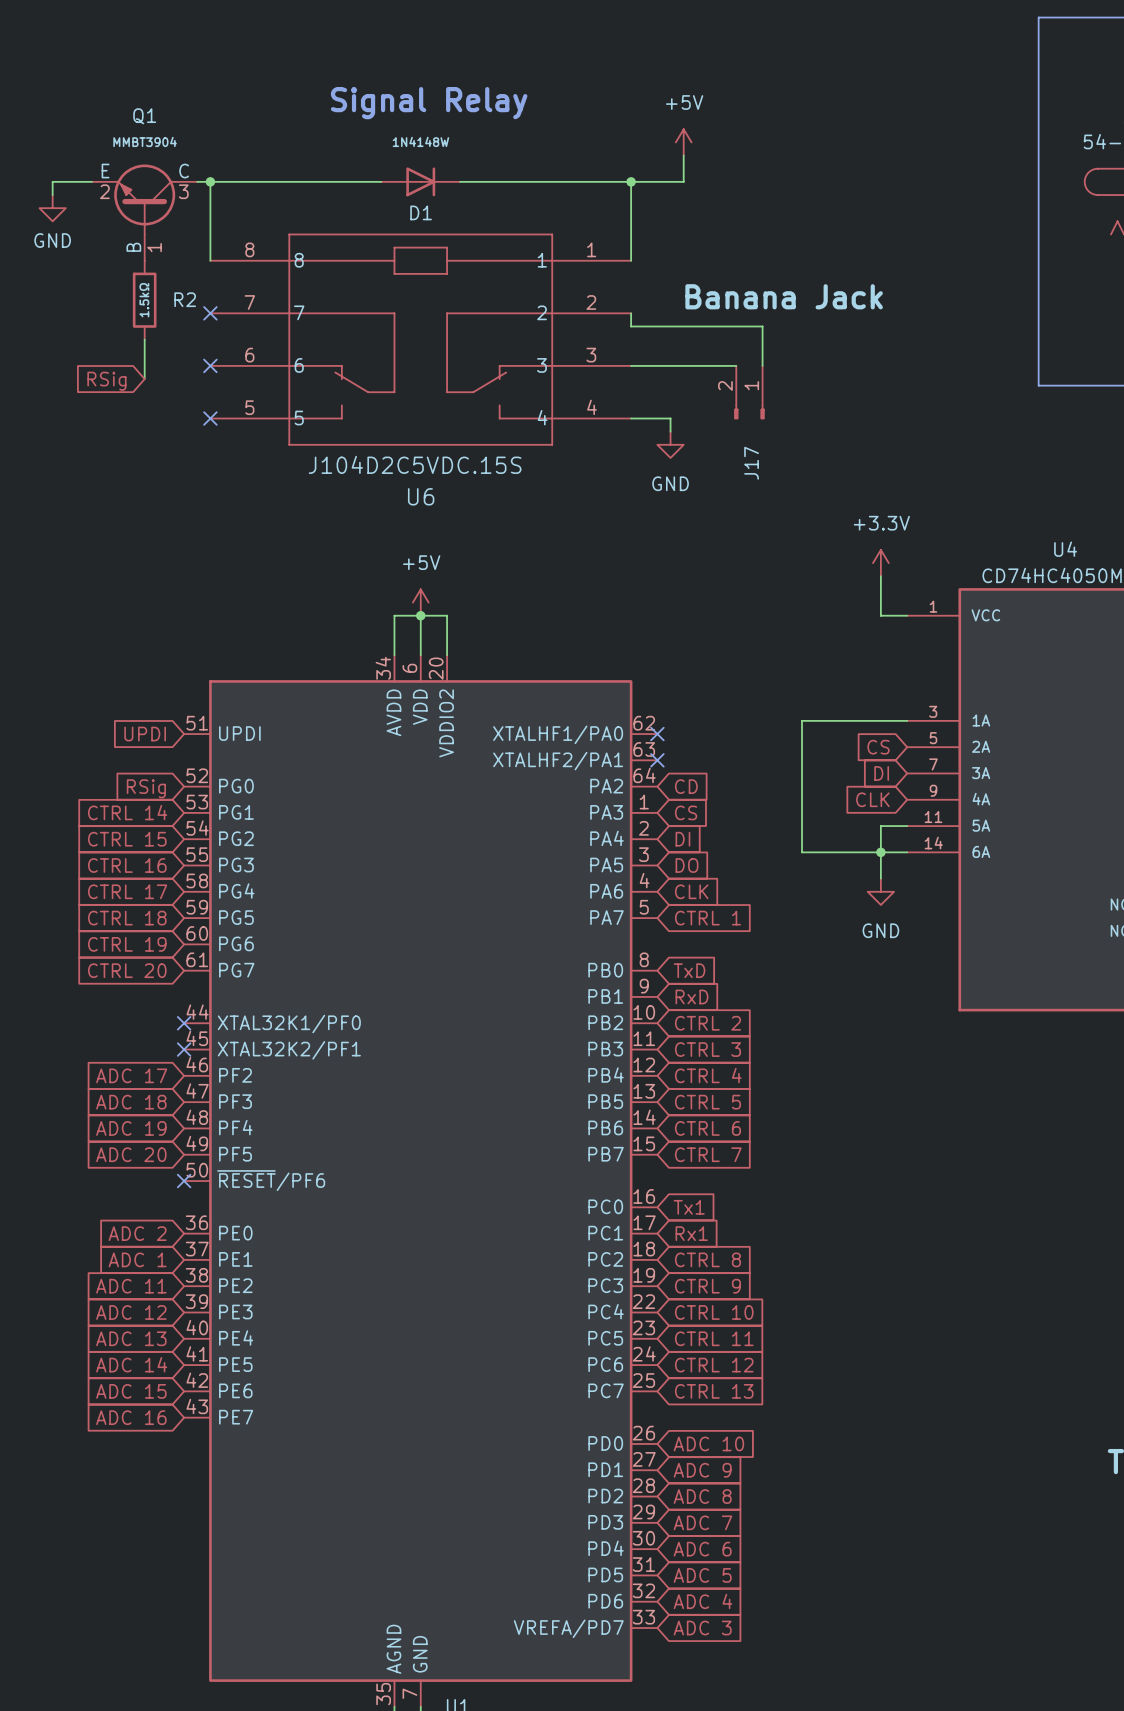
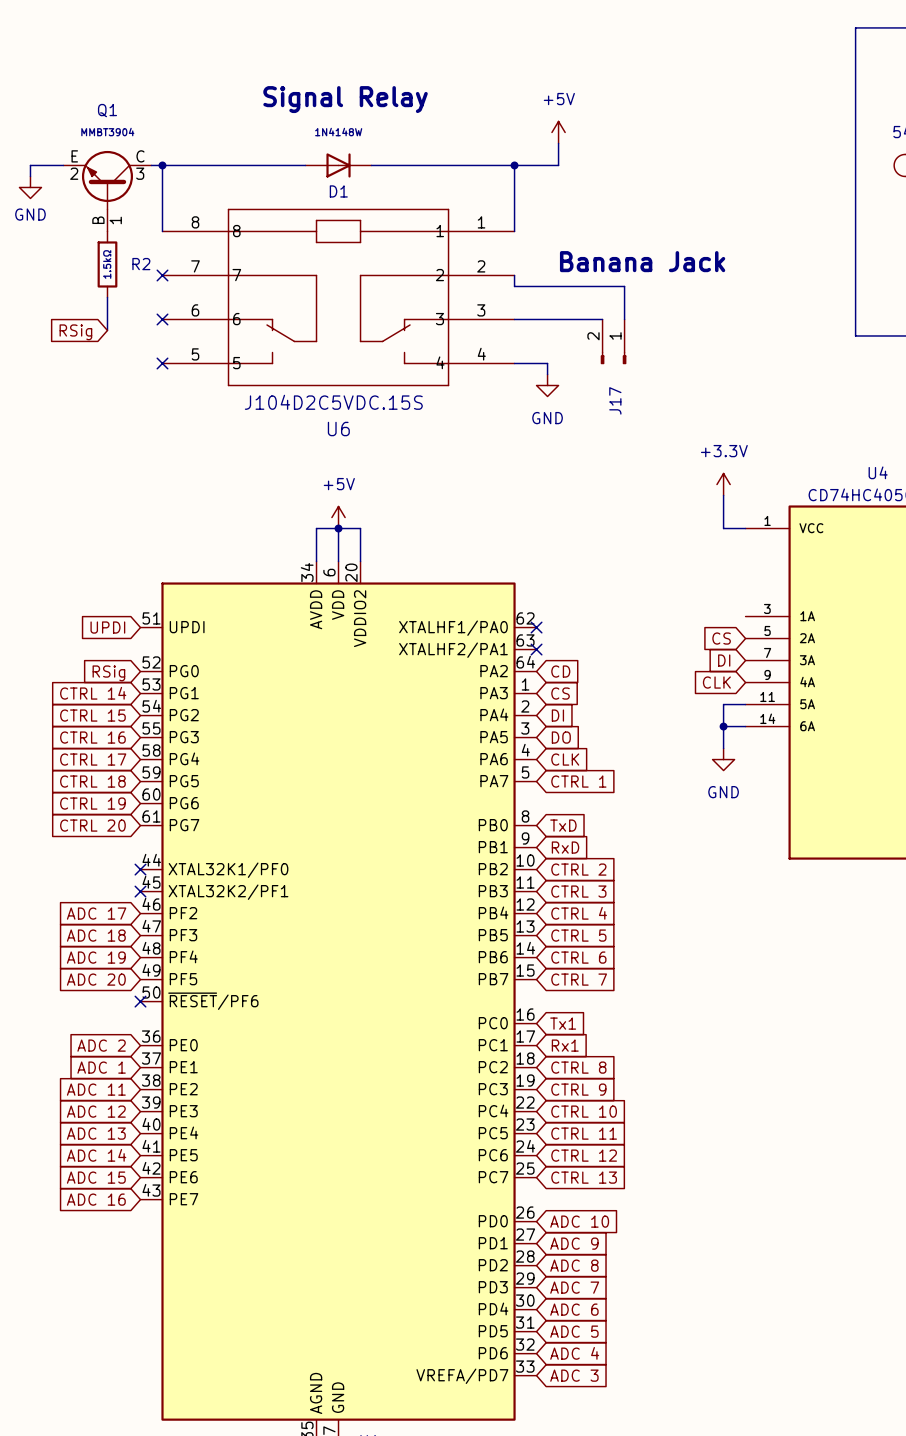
wire: (907, 720) (802, 720) (802, 852) (880, 852) -> none

